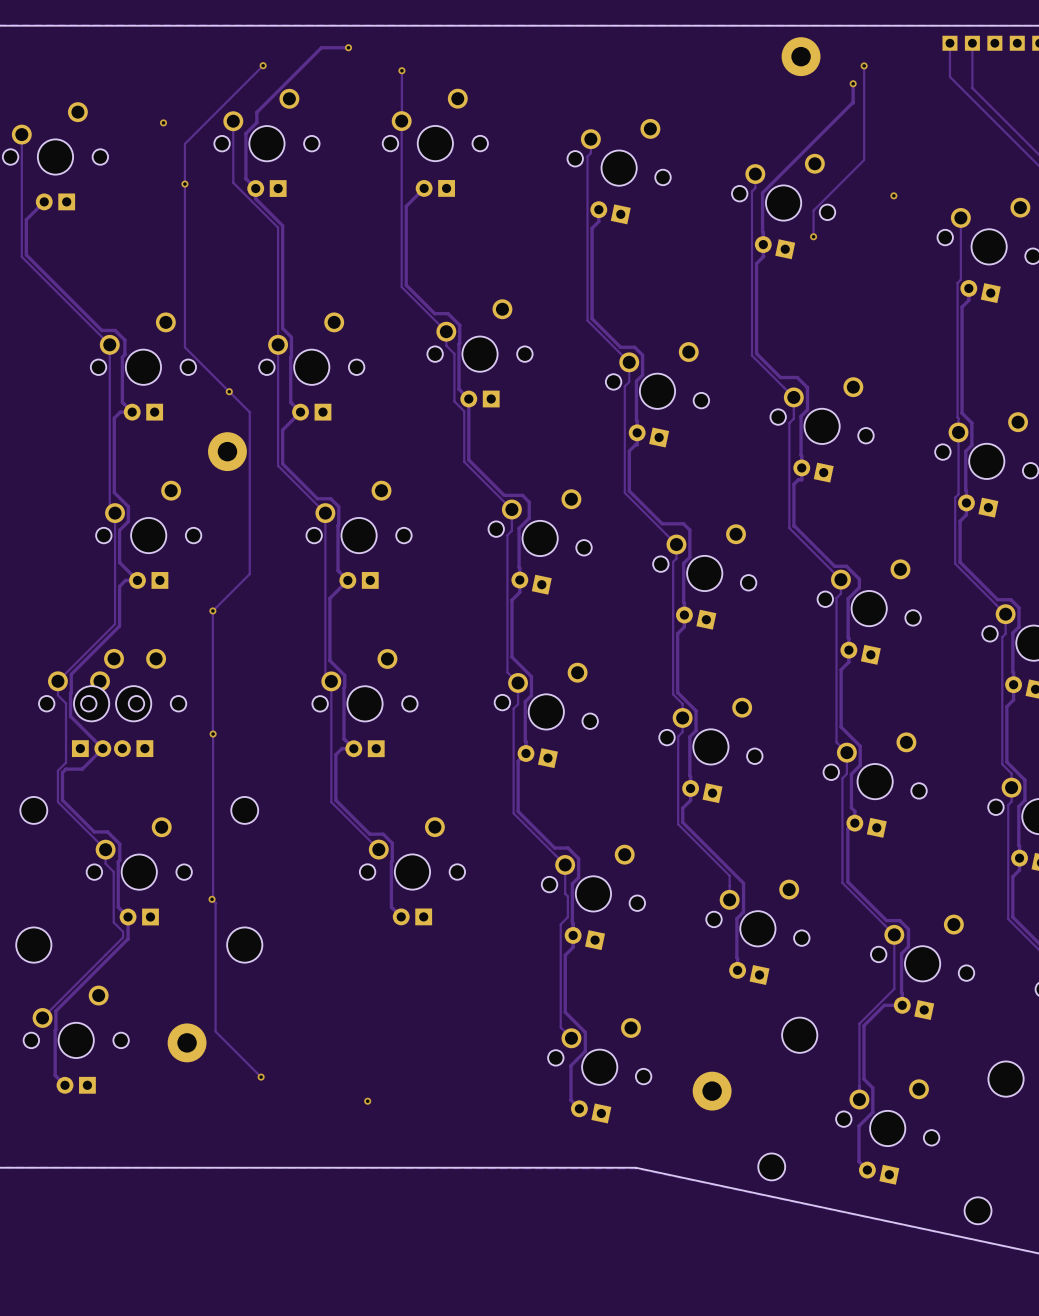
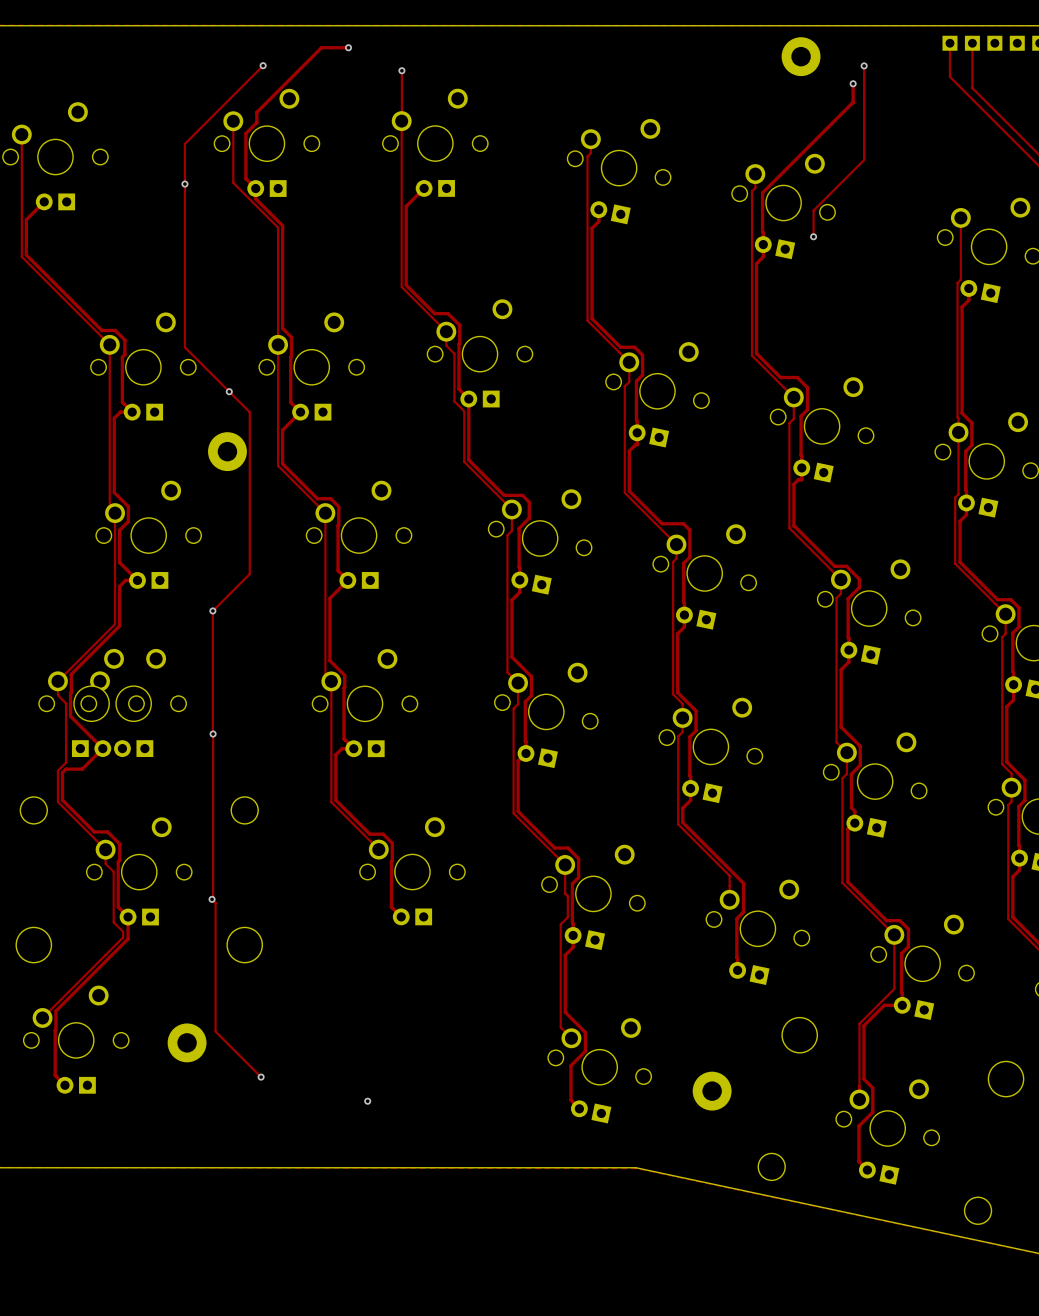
via: (163, 122) -> none
via: (893, 195) -> none

